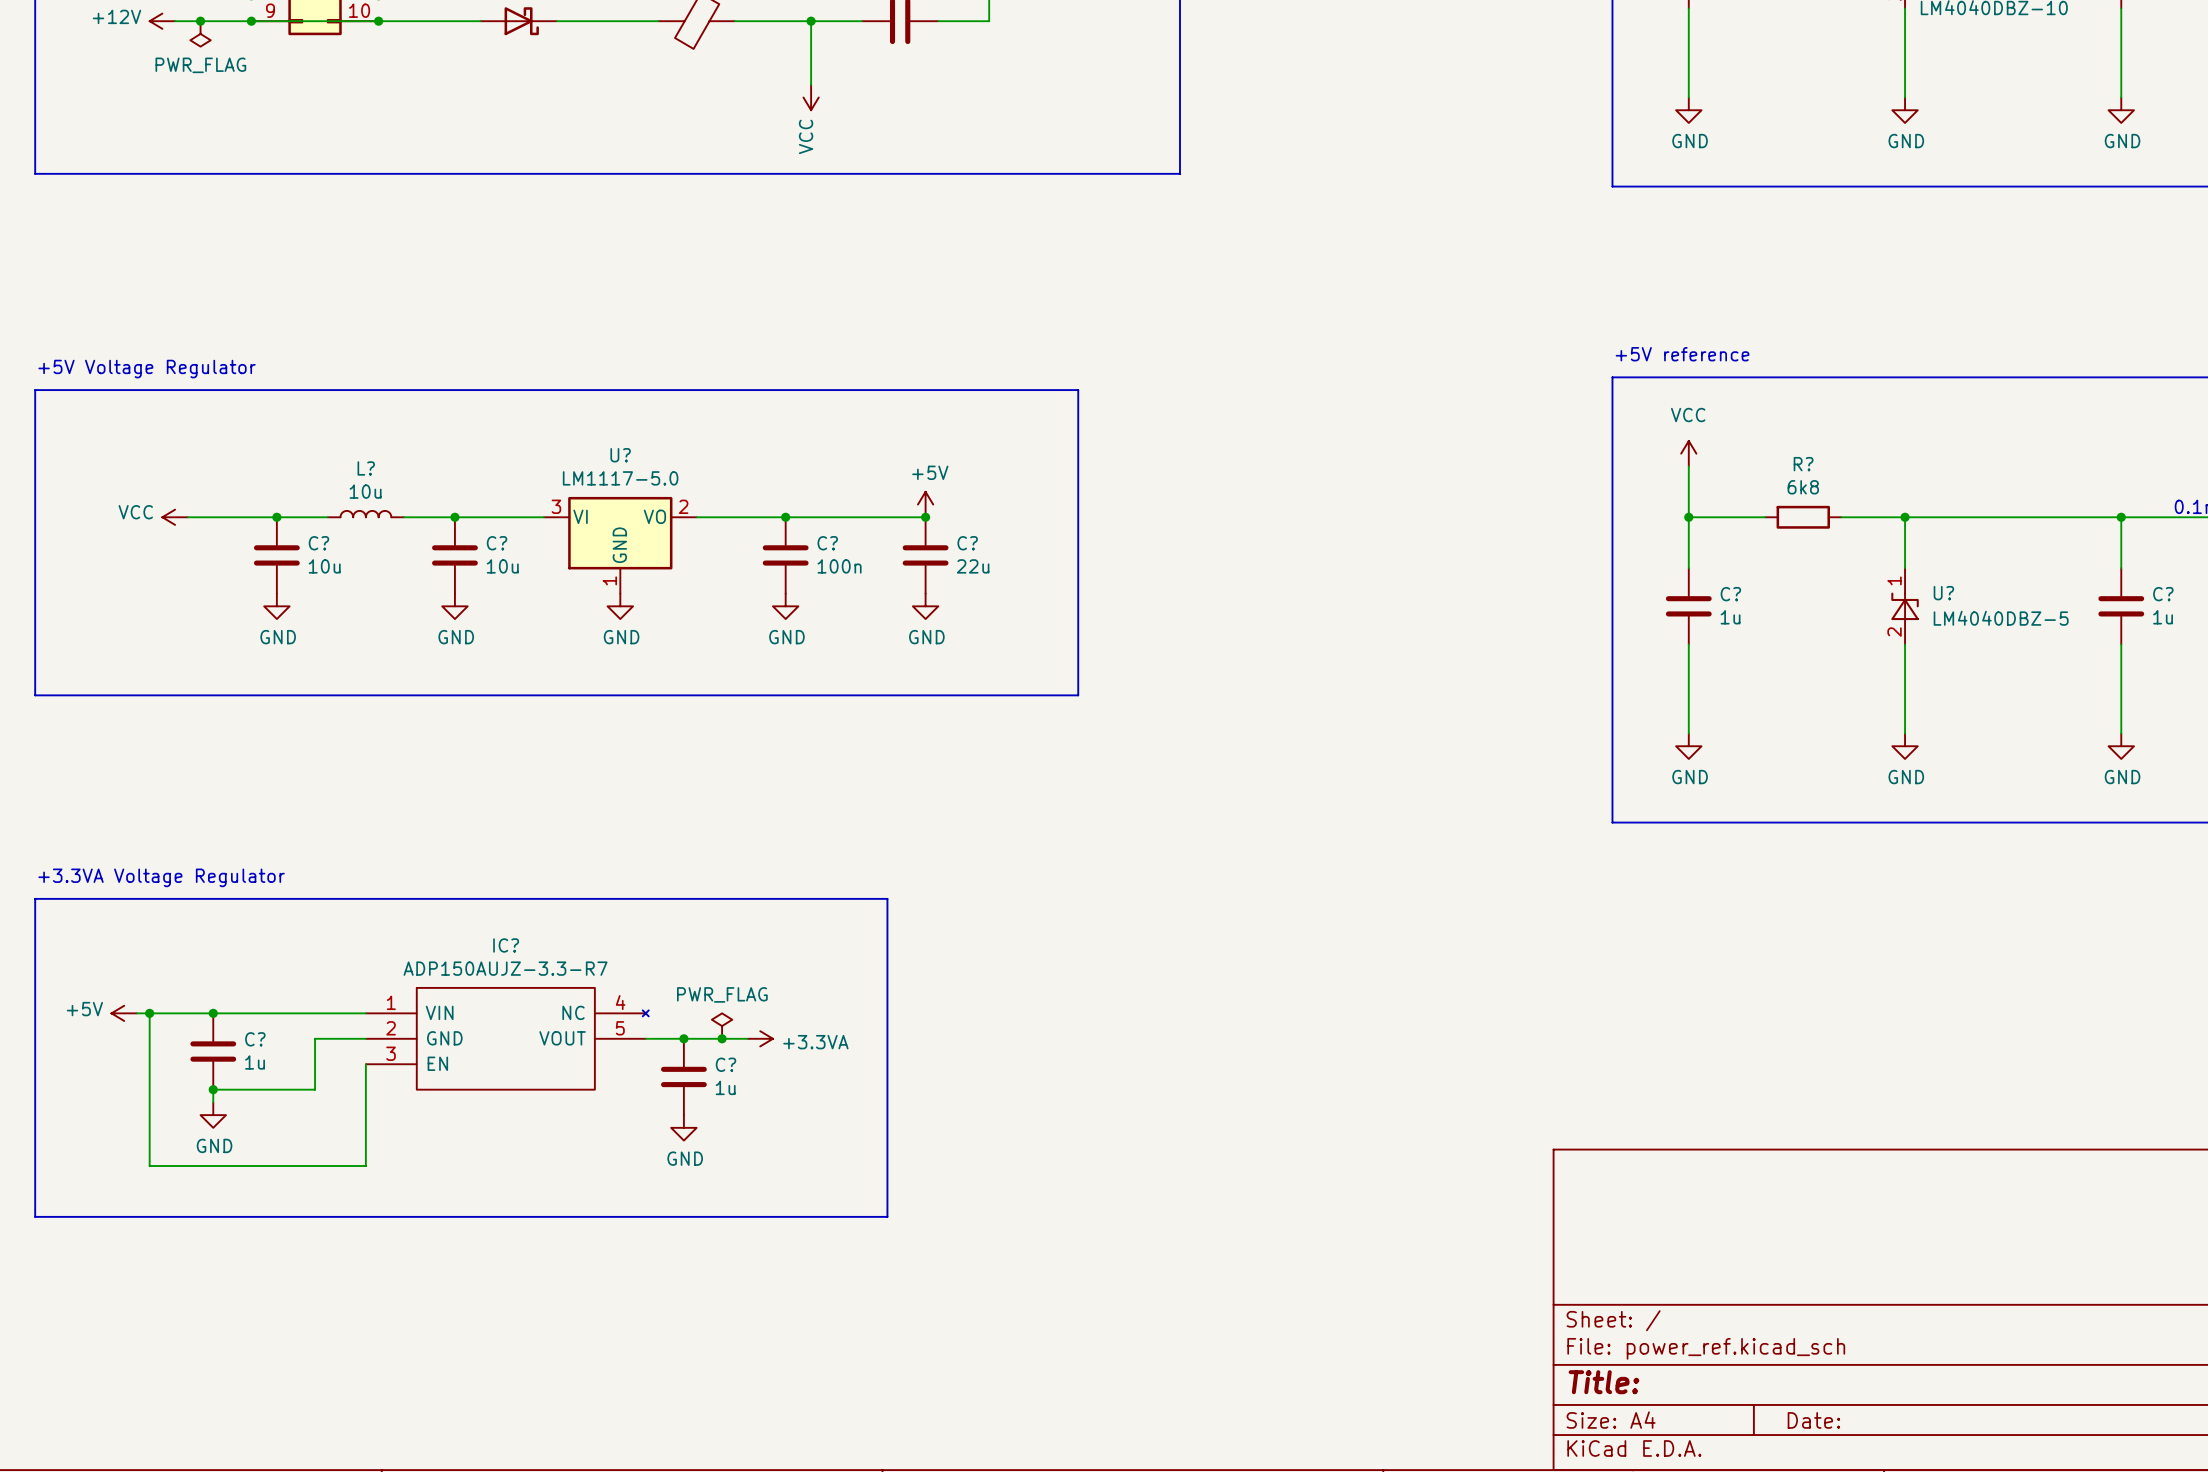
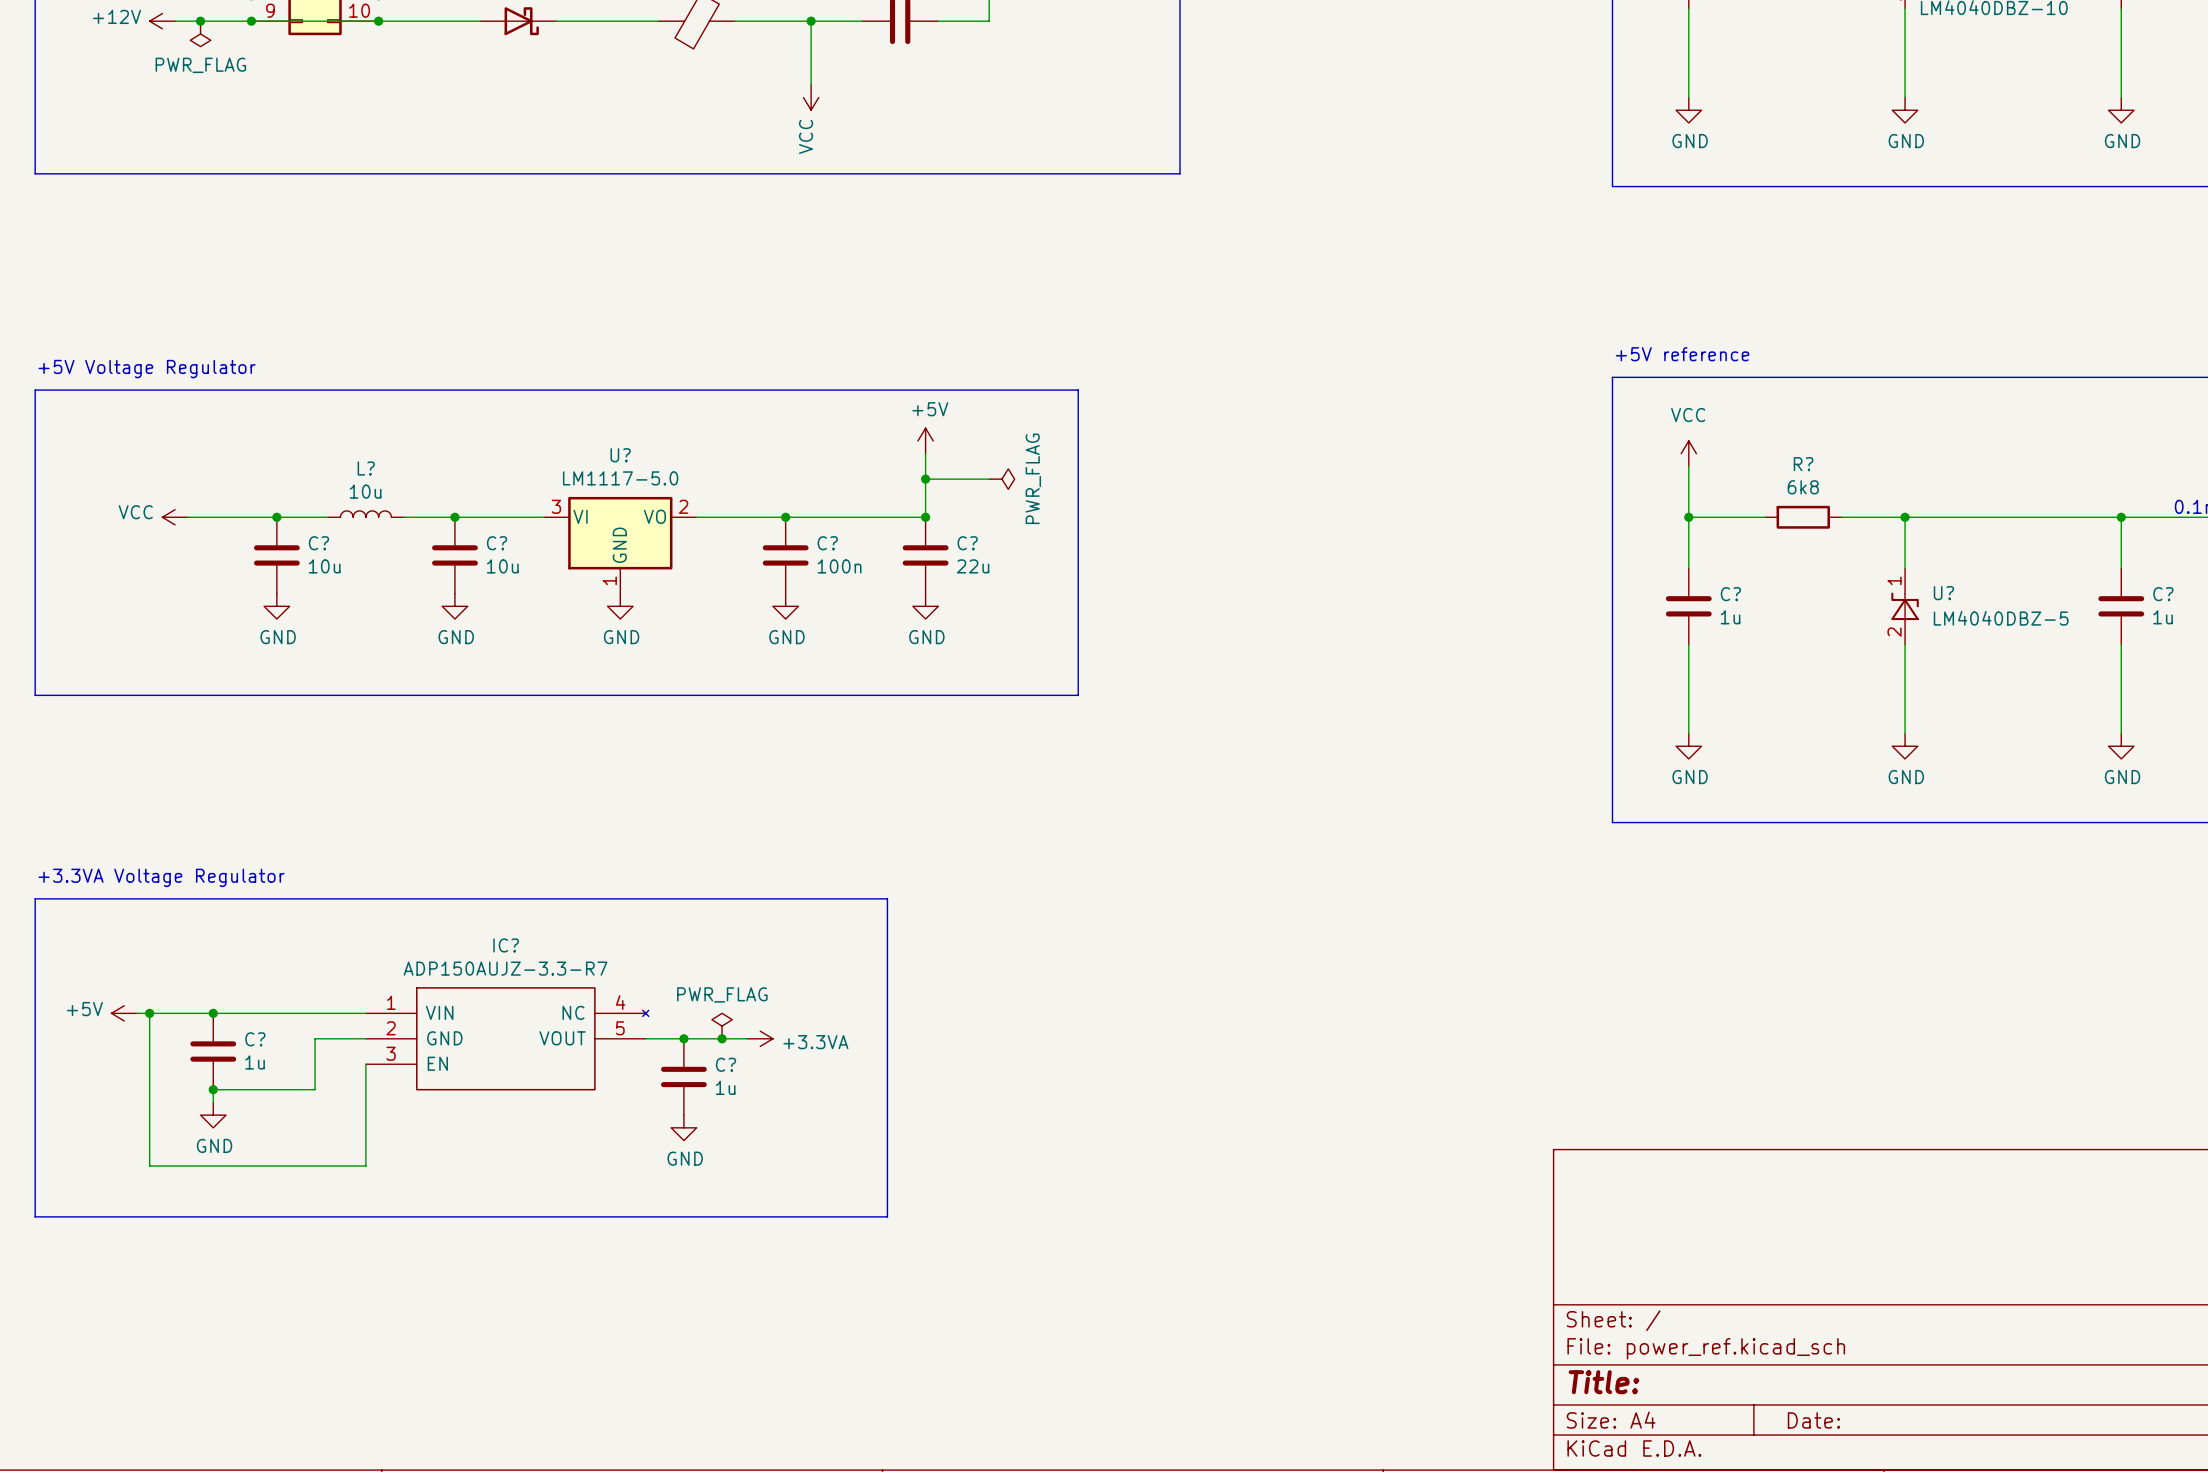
wire: none -> (925, 453) (925, 517)
wire: none -> (925, 479) (989, 479)
junction: none -> (925, 479)
power symbol: none -> PWR_FLAG (1001, 479)
power symbol position: +5V (925, 504) -> +5V (925, 440)

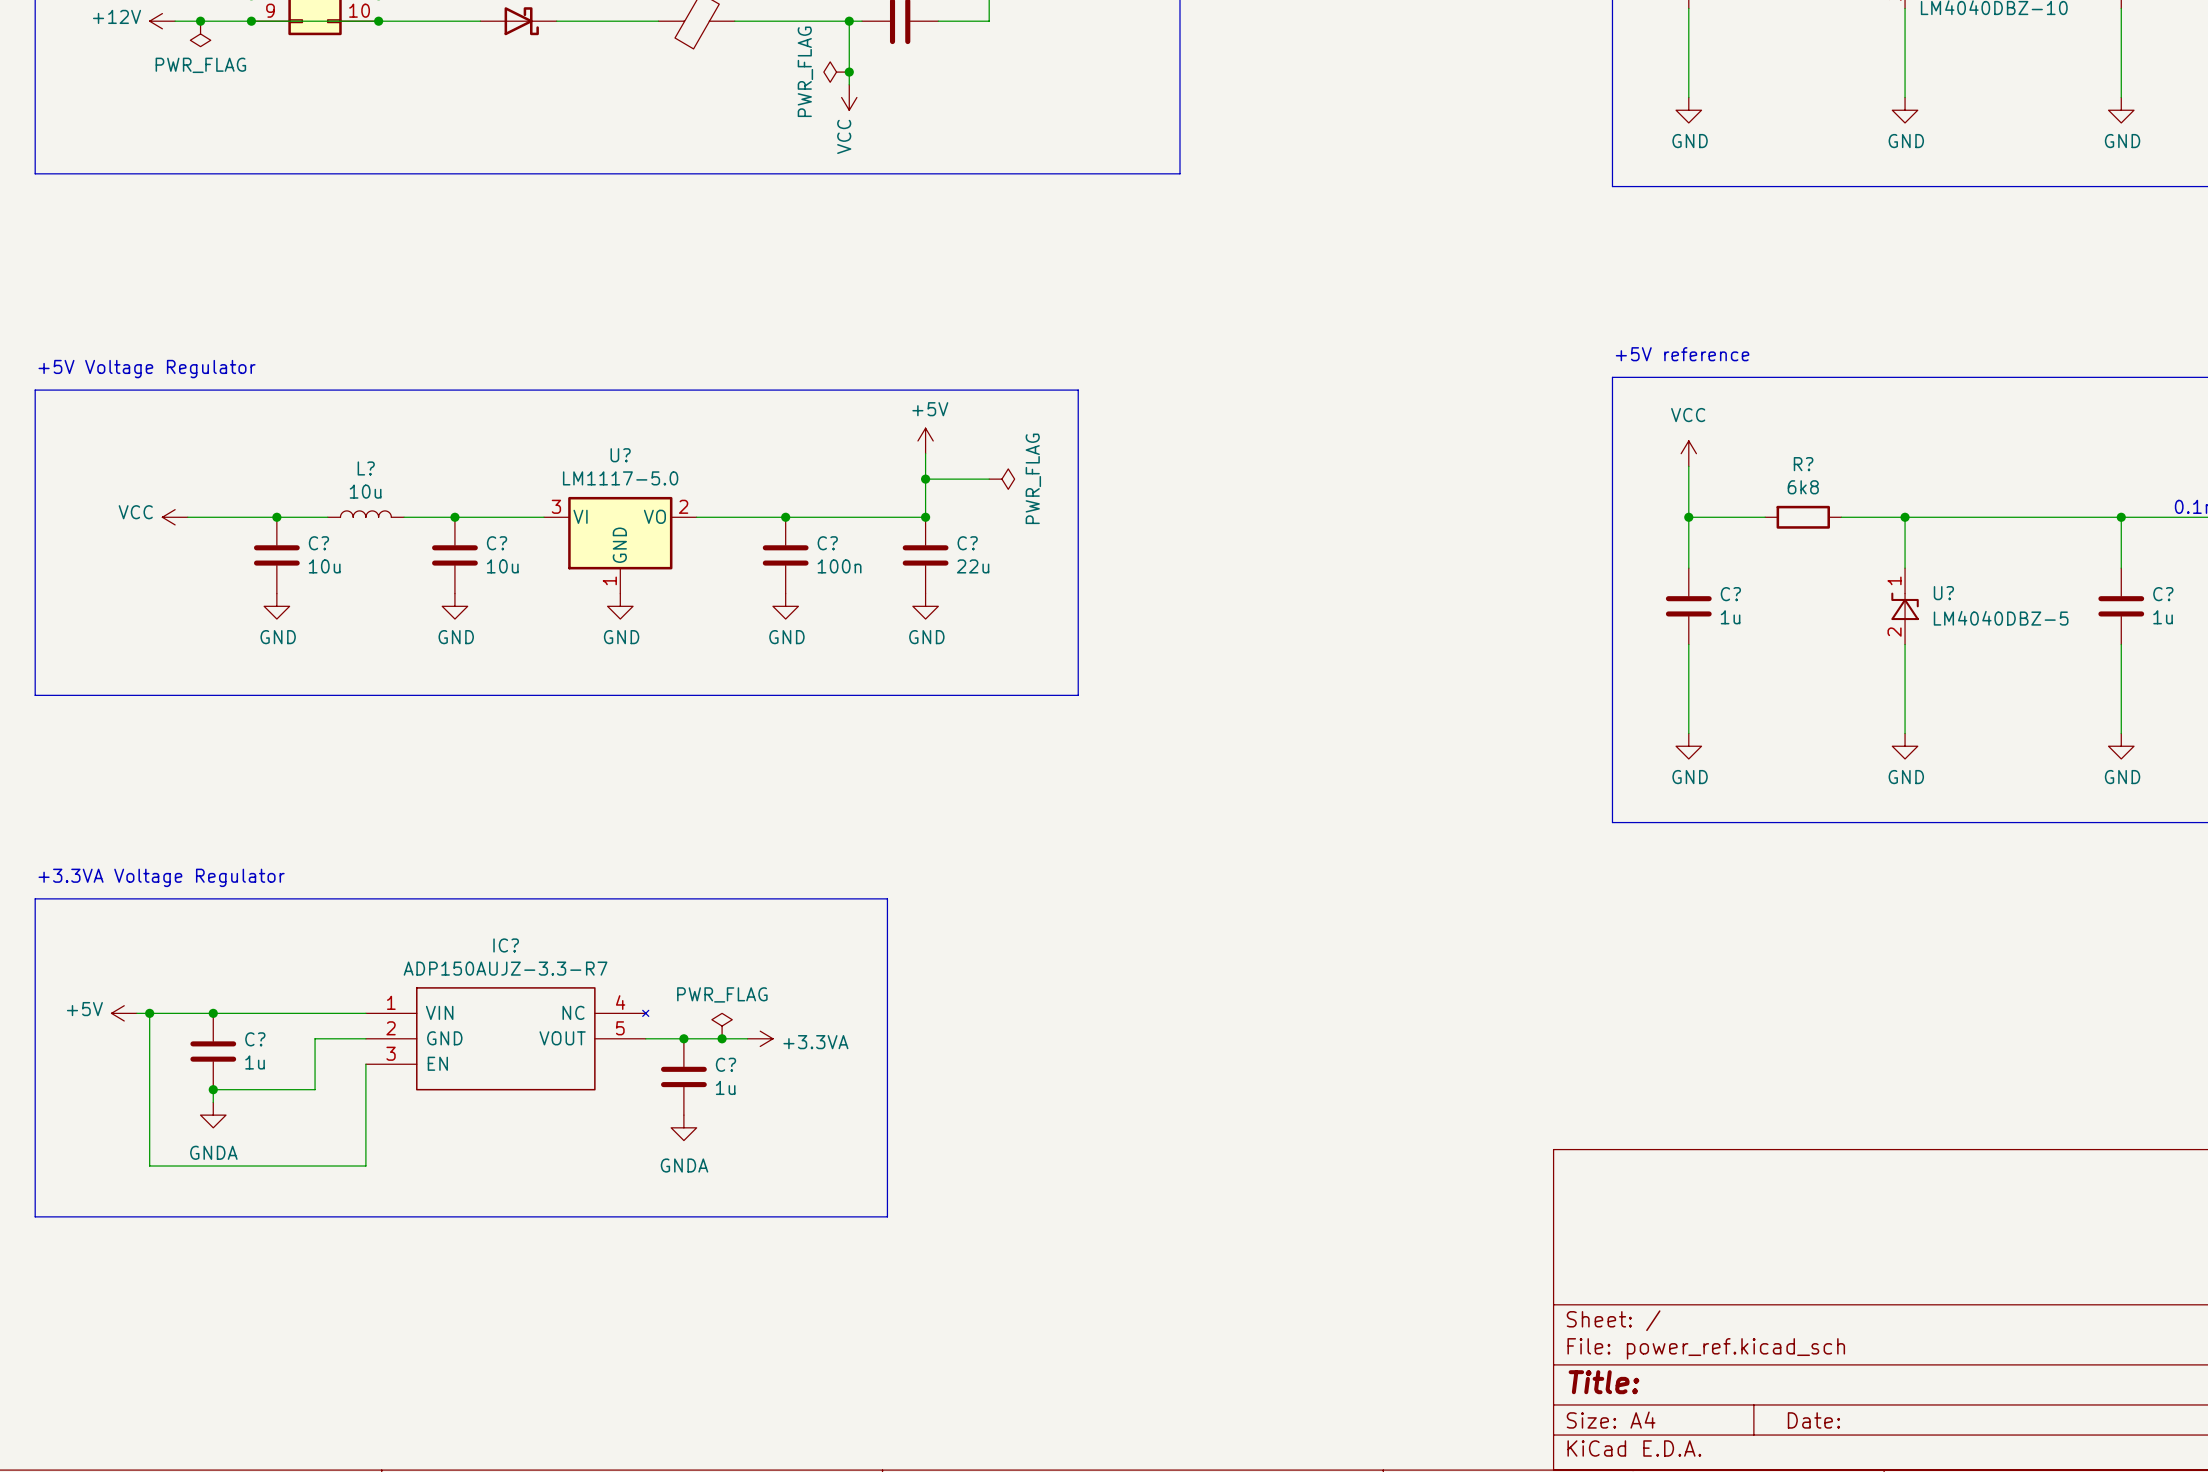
wire: (811, 21) (811, 84) -> (849, 21) (849, 84)
junction: (811, 21) -> none
junction: none -> (849, 21)
power symbol: none -> PWR_FLAG (836, 72)
junction: none -> (849, 72)
power symbol position: VCC (811, 97) -> VCC (849, 97)
power symbol: GND (213, 1115) -> GNDA (213, 1115)
power symbol: GND (683, 1127) -> GNDA (683, 1127)

